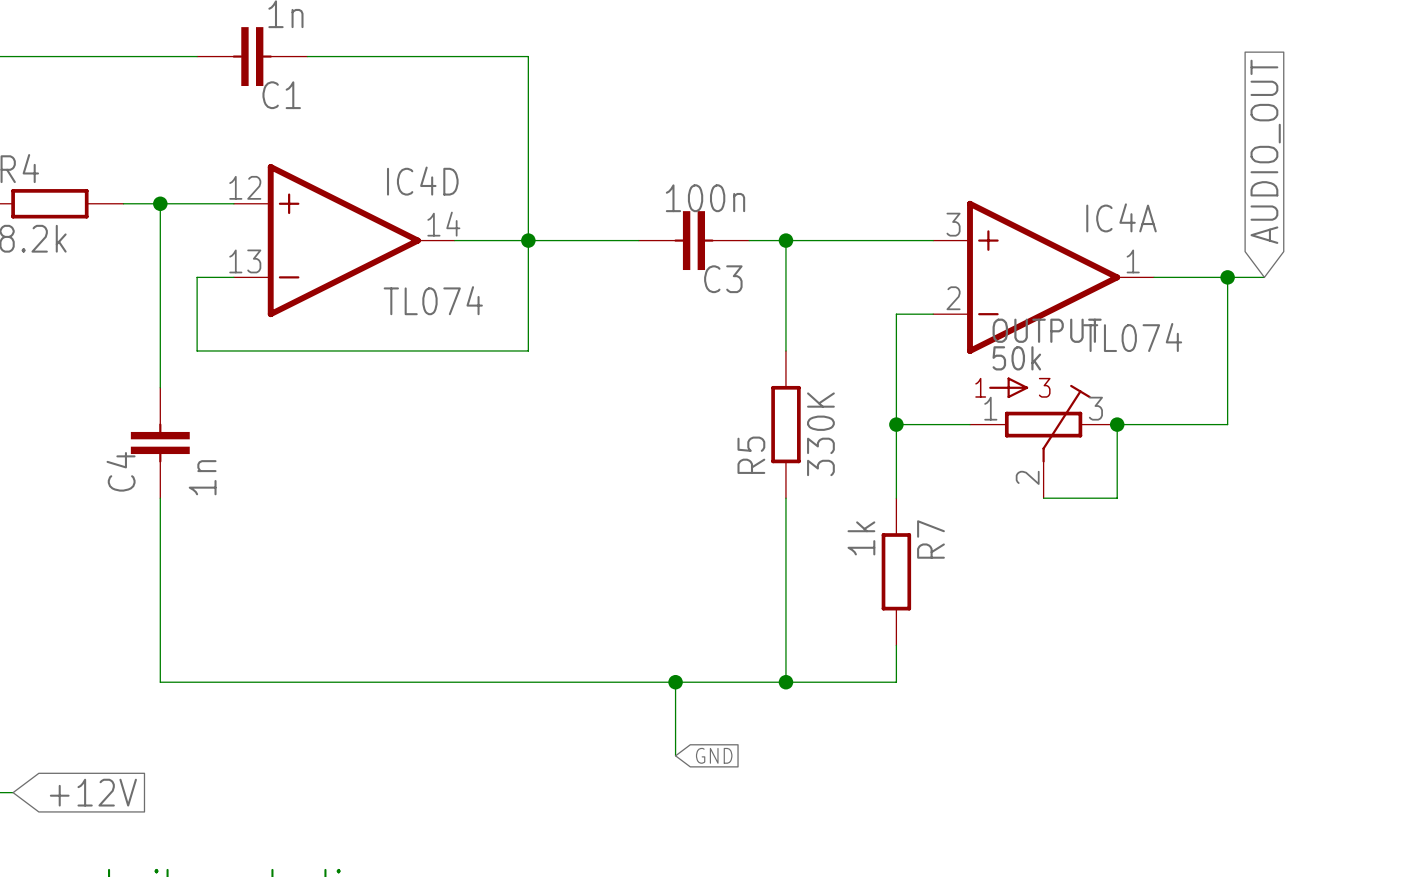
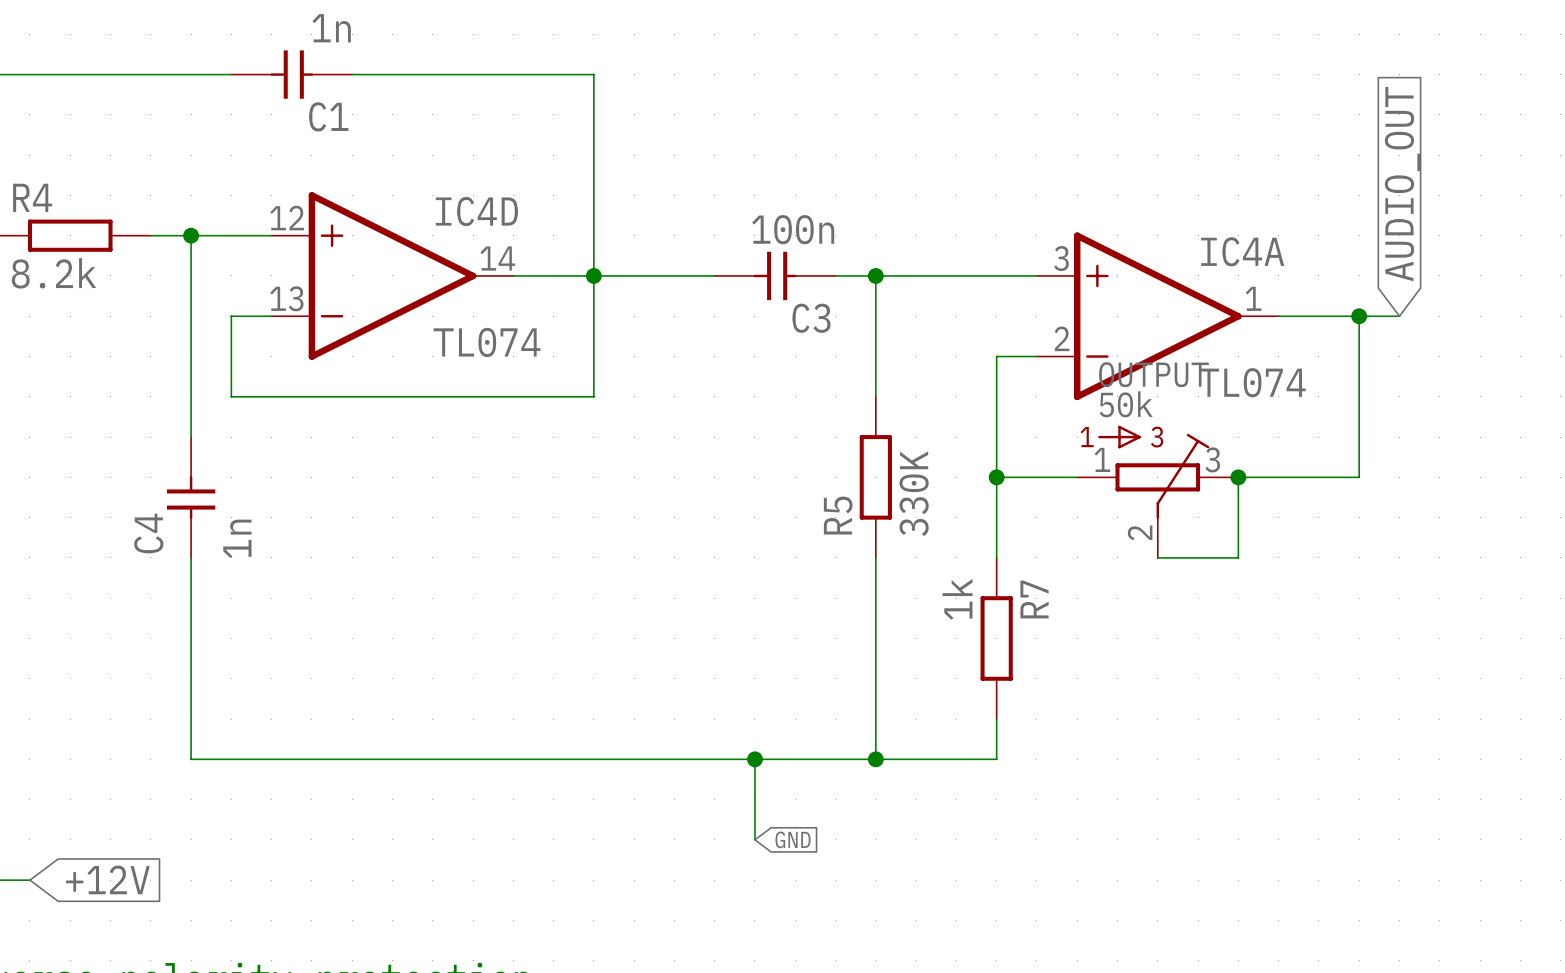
C1 symbol: [197, 27, 308, 87] -> [231, 50, 353, 99]
C3 symbol: [638, 211, 750, 271] -> [714, 251, 836, 301]
C4 symbol: [130, 387, 190, 499] -> [166, 437, 216, 558]

